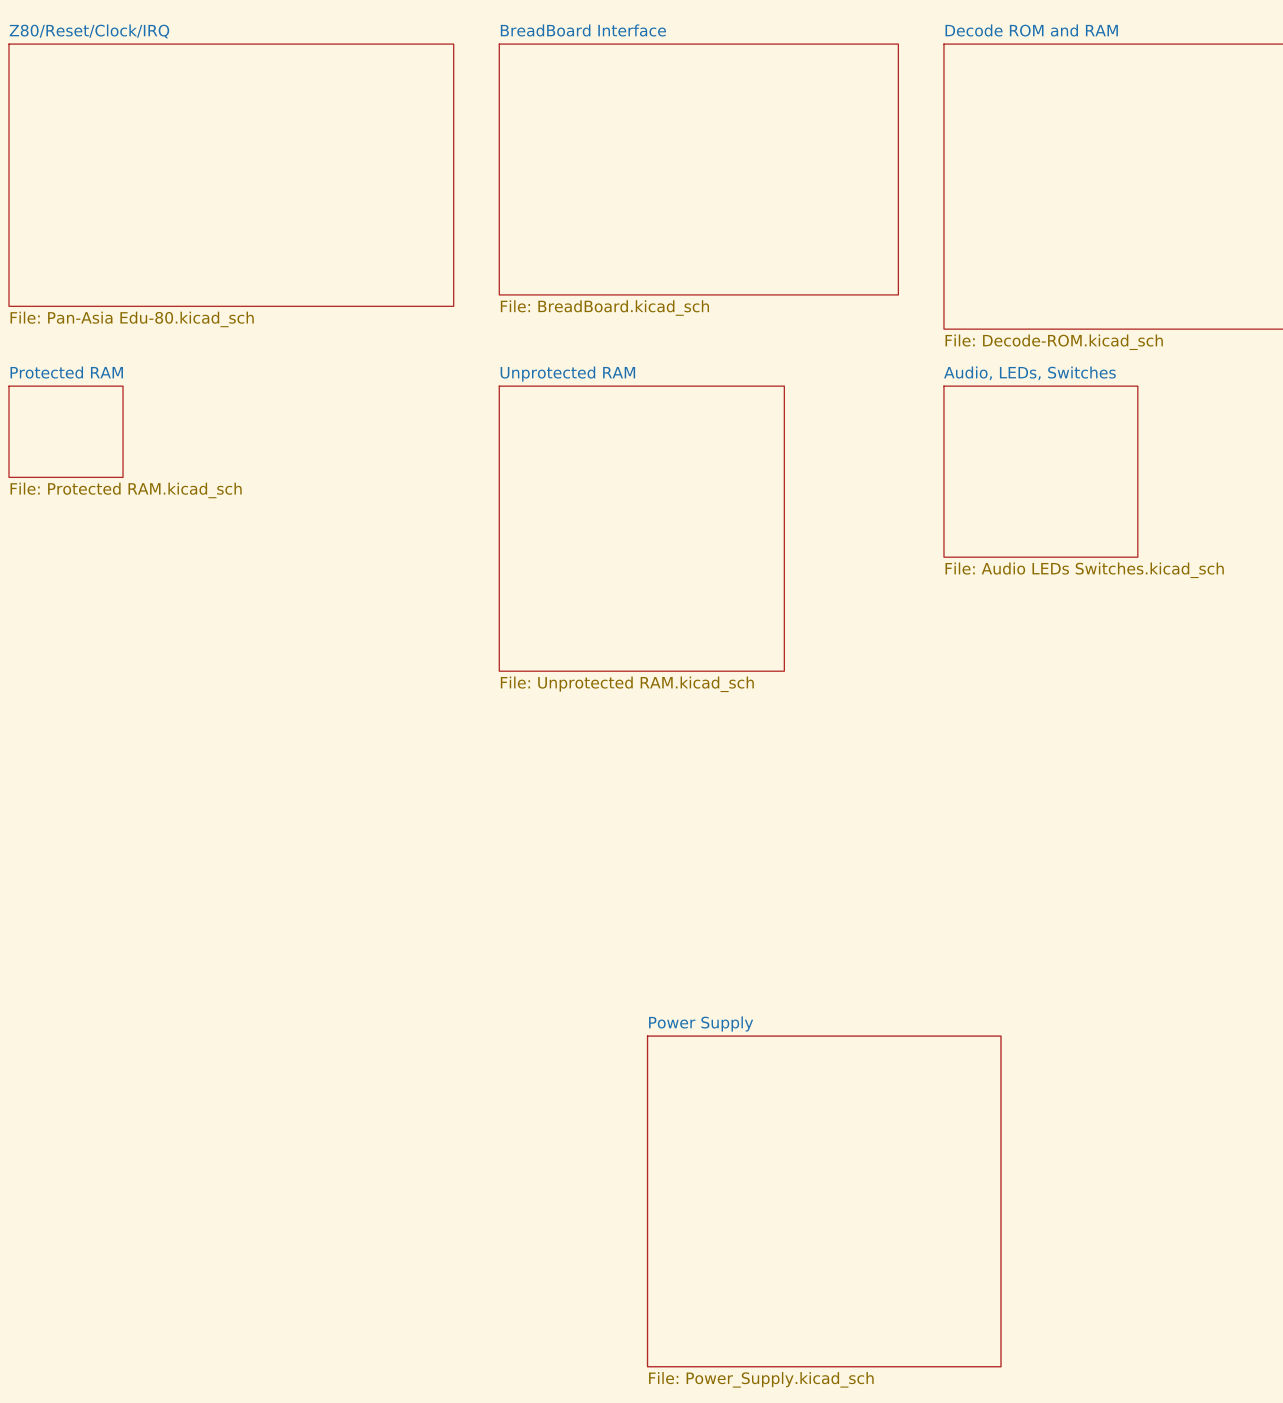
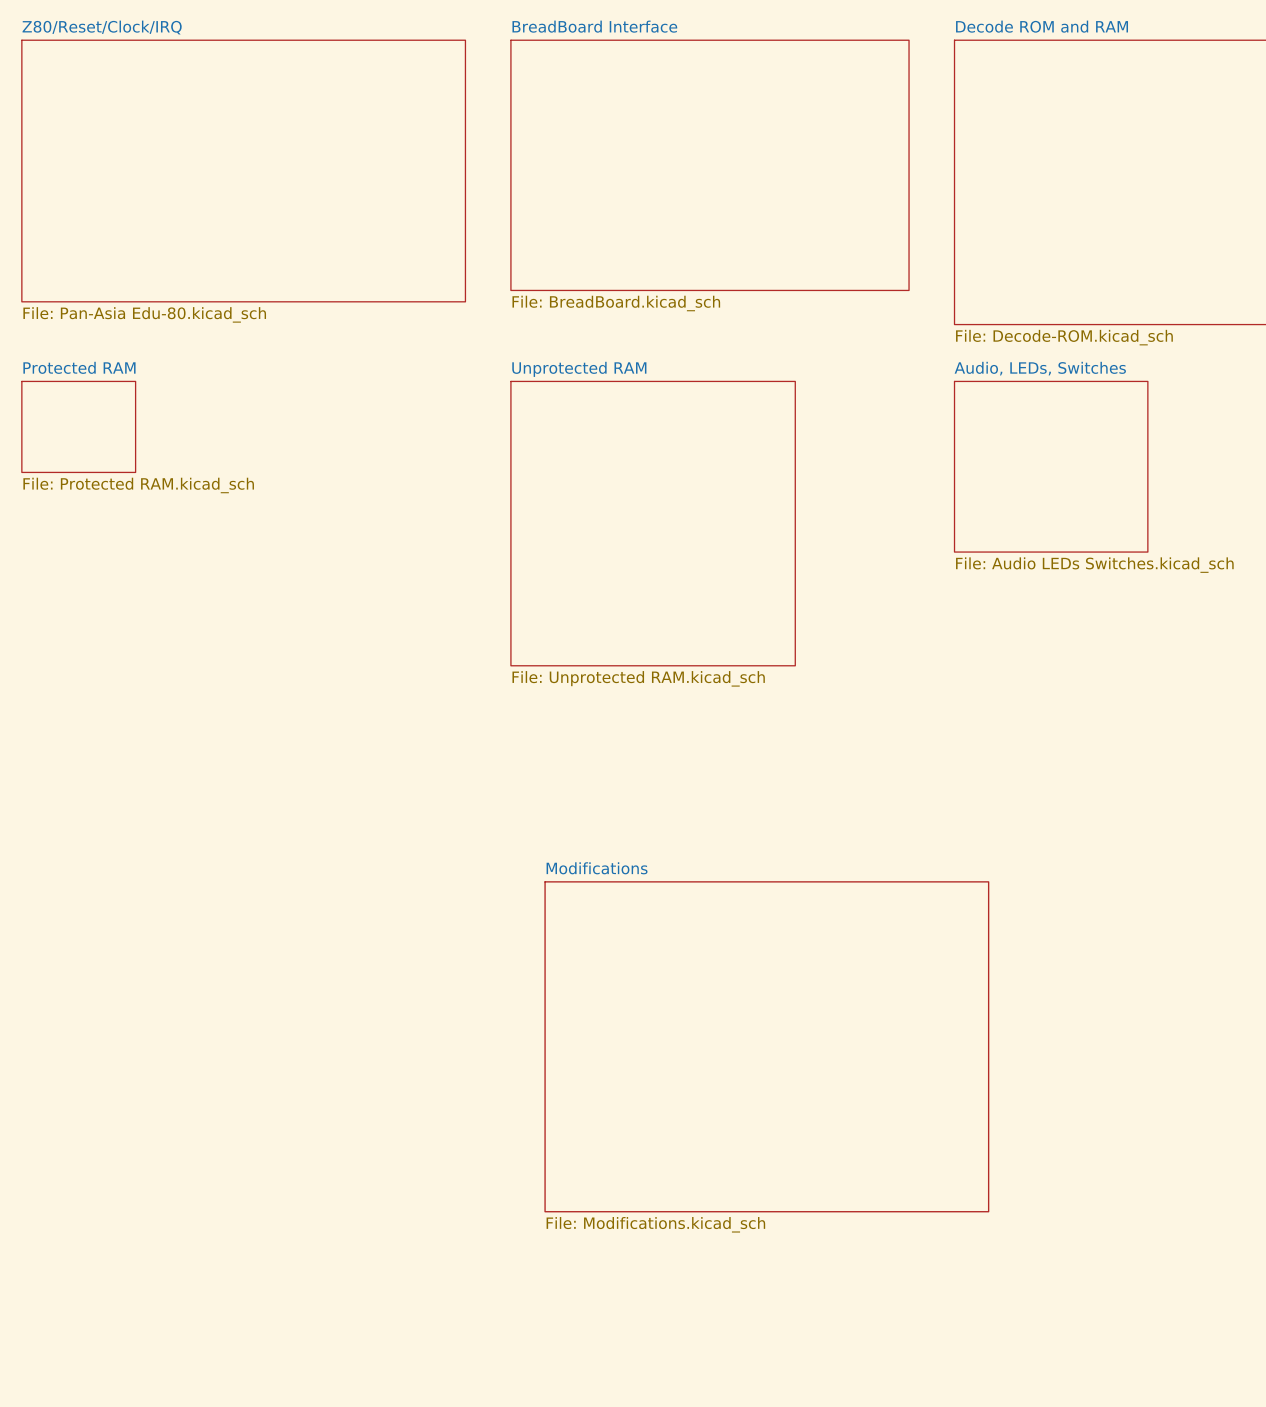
sheet Modifications: none -> File: Modifications.kicad_sch (766, 1046)
sheet Power Supply: File: Power_Supply.kicad_sch (824, 1201) -> none

